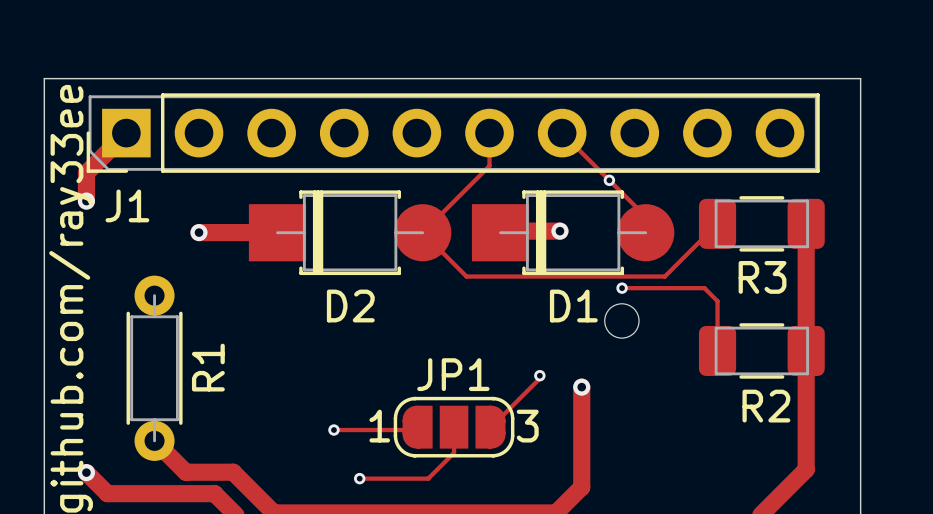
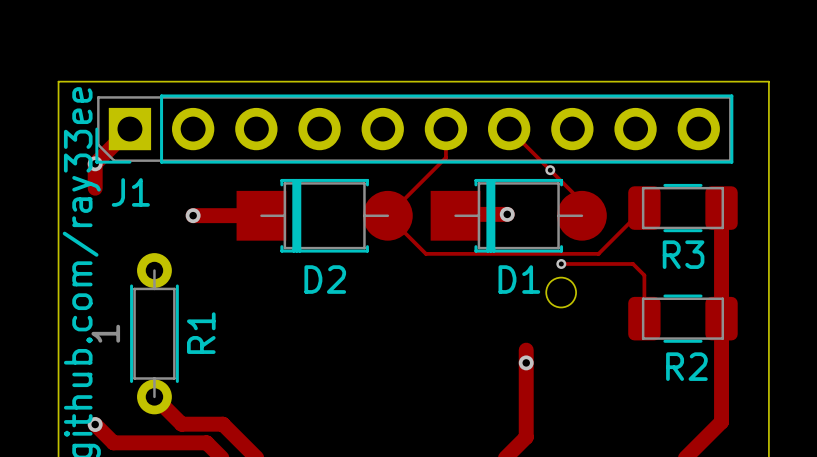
via position: (86, 201) -> (95, 163)
R1 value: none -> 1 (105, 333)
track: (539, 375) (539, 378) (491, 427) -> none
via: (539, 375) -> none
via position: (581, 387) -> (526, 362)
track: (416, 427) (414, 430) (333, 430) -> none
track: (454, 427) (454, 452) (428, 478) (359, 478) -> none
JP1: (454, 427) -> none
via: (333, 430) -> none
via: (359, 478) -> none

